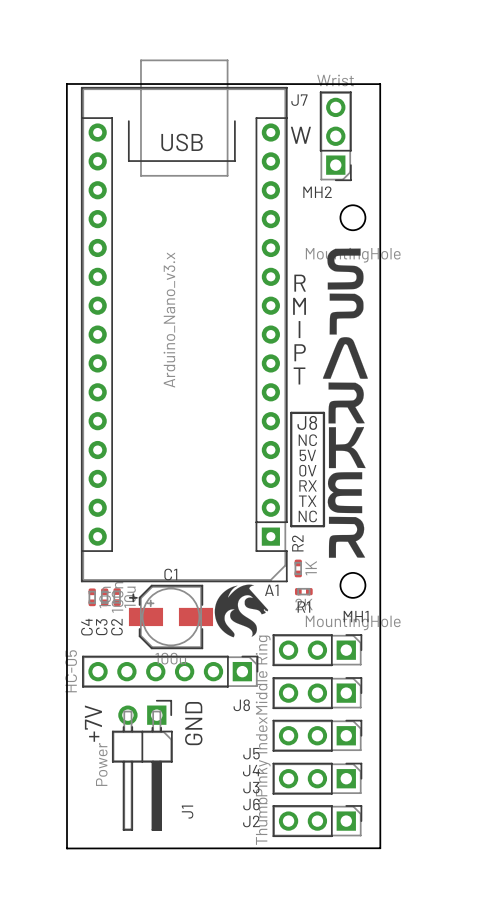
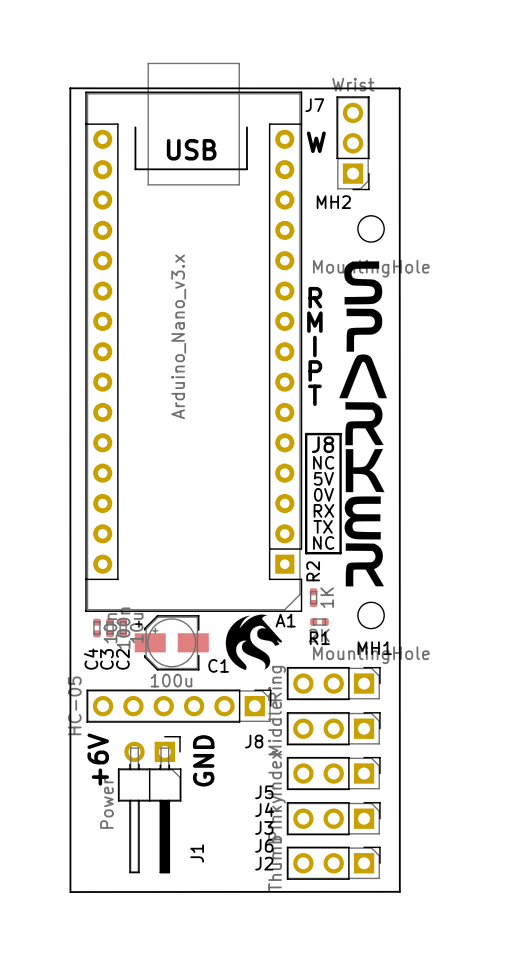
C1 name position: C1 (170, 574) -> C1 (218, 665)
C1 footprint: [128, 584, 214, 650] -> [134, 615, 209, 671]
text: +7V (93, 723) -> +6V (98, 759)

